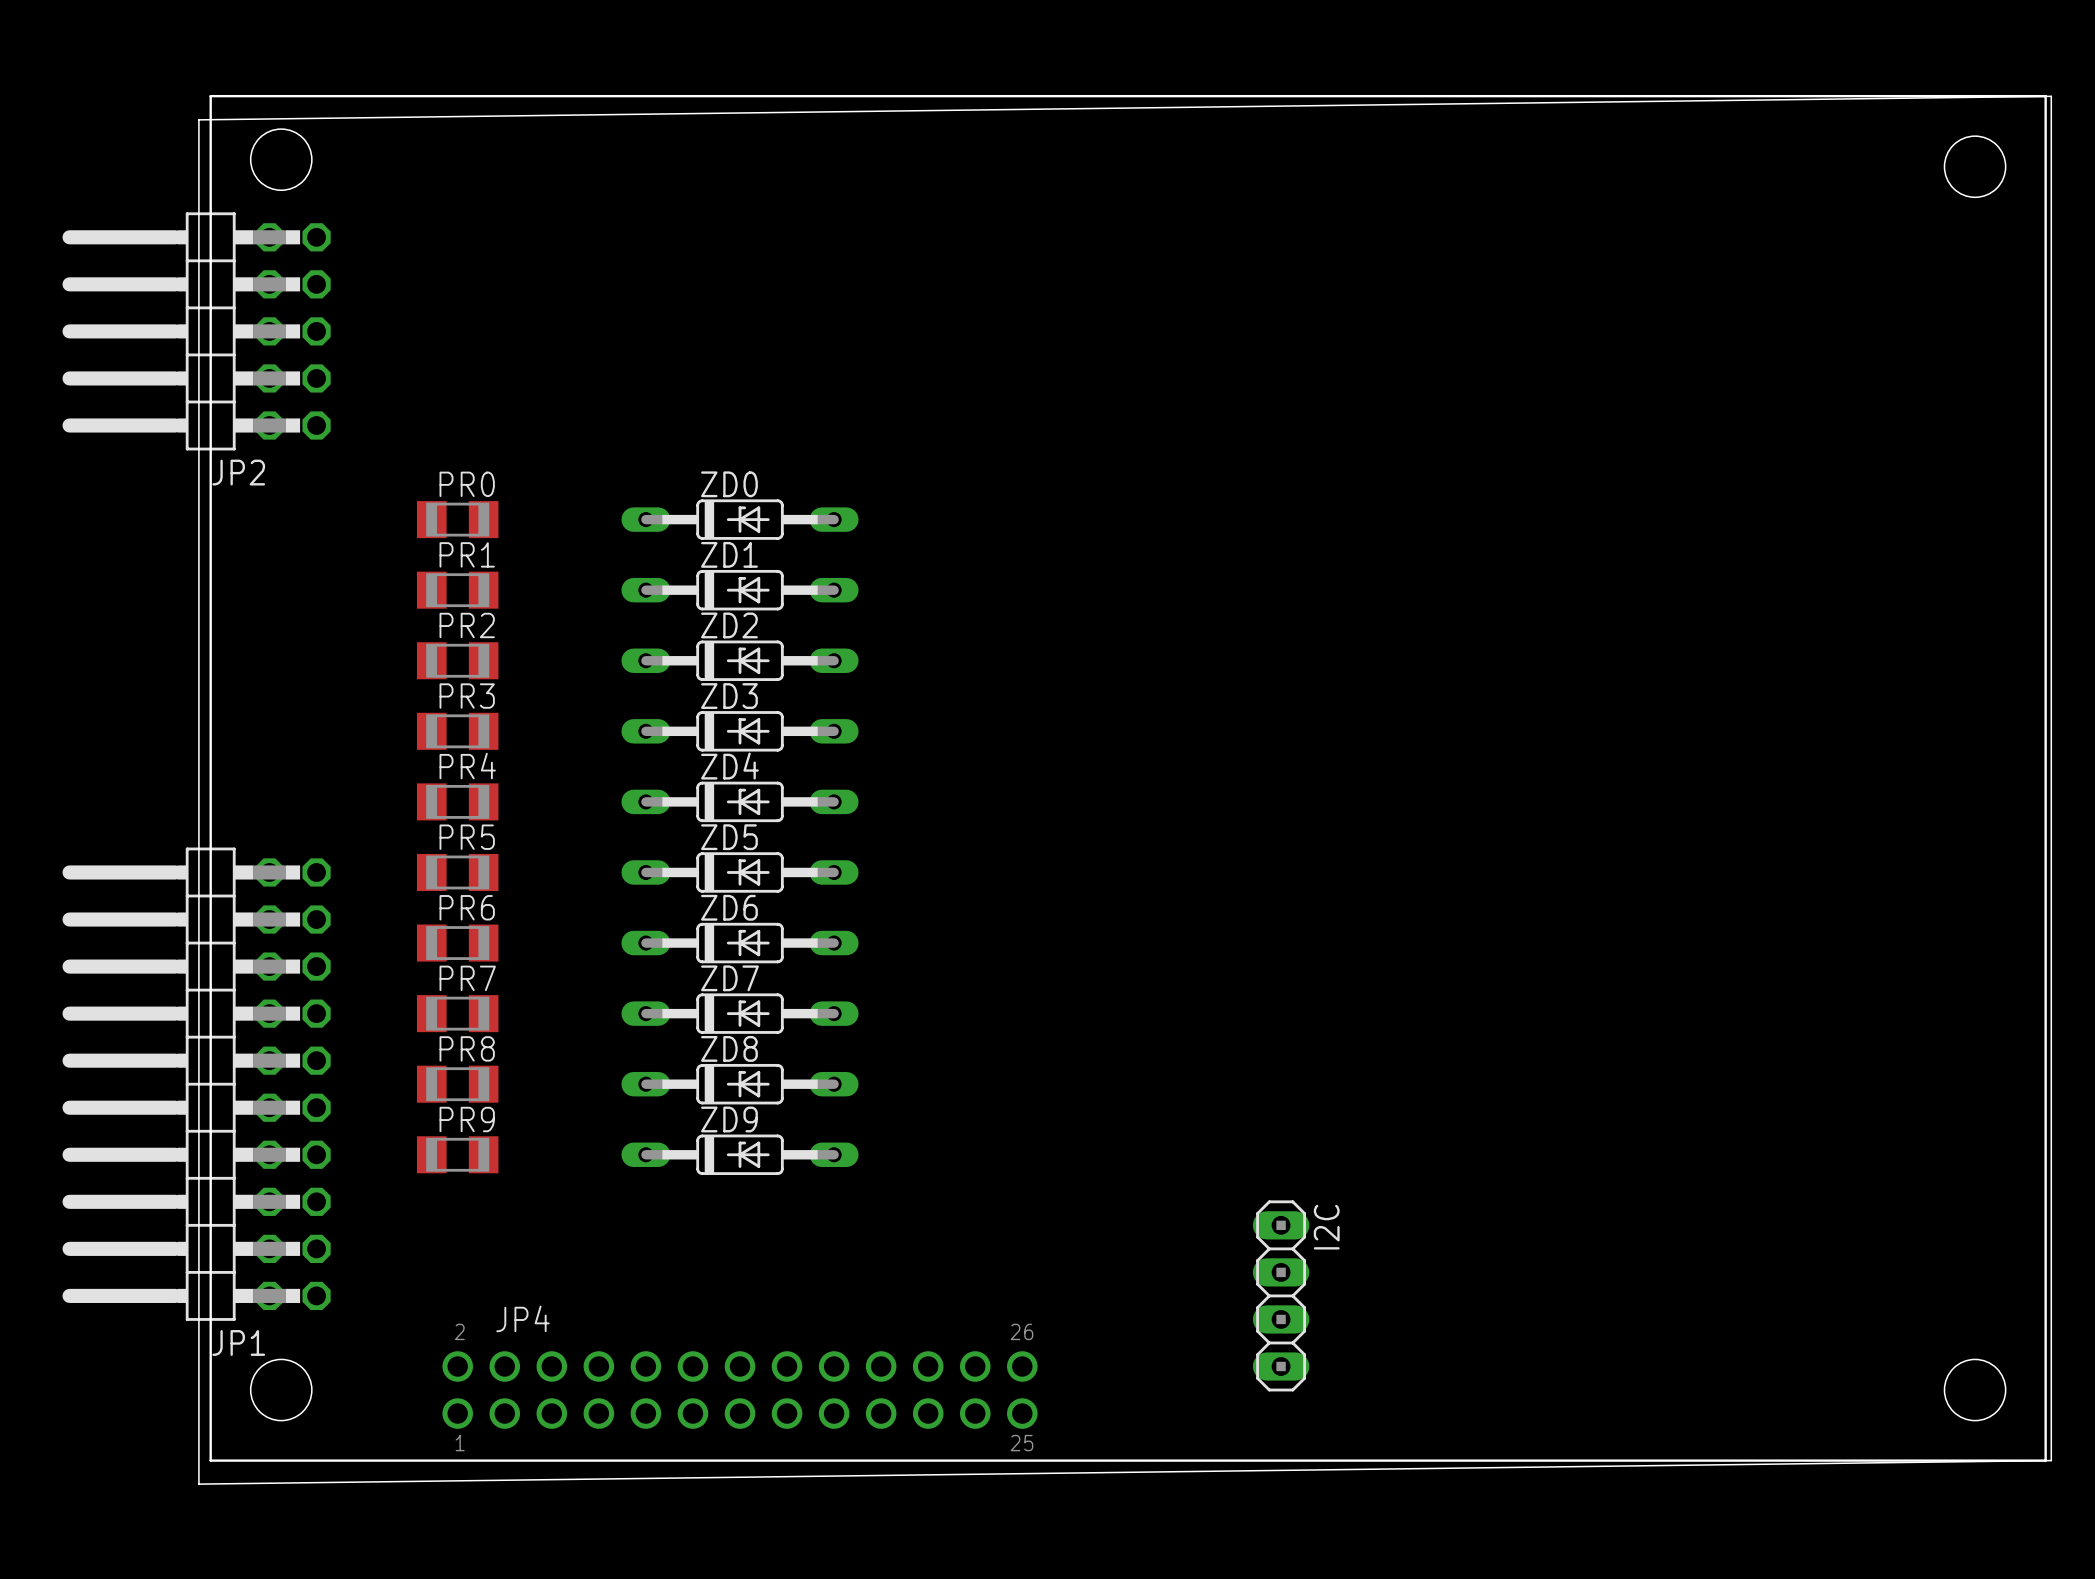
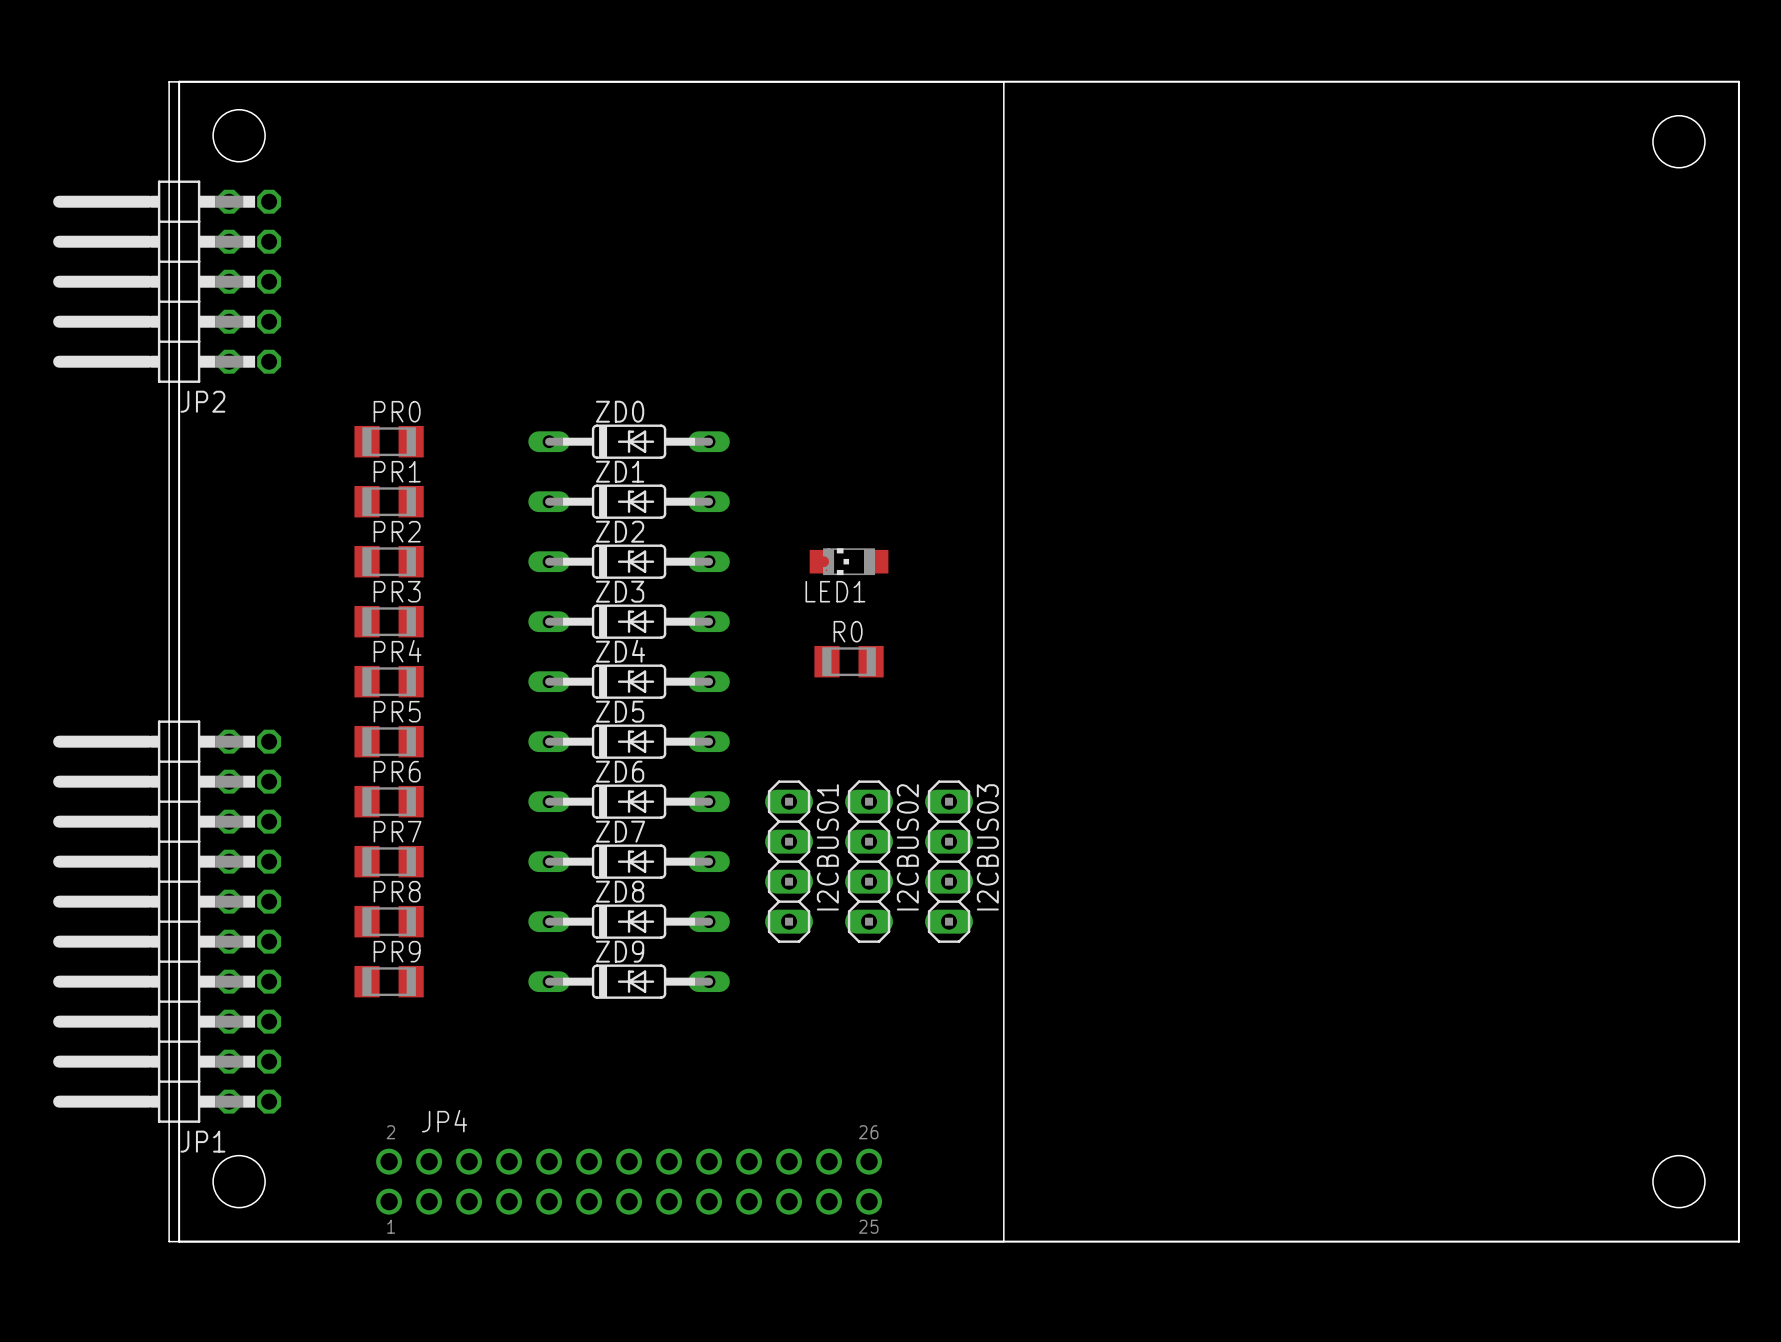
board edge: (198, 119) (2051, 96) (2051, 1460) (198, 1484) (198, 1460) -> (169, 101) (169, 81) (1003, 81) (1003, 1241) (169, 1241)
LED1: none -> (849, 561)
R0: none -> (849, 661)
I2CBUS01: none -> (789, 861)
I2CBUS02: none -> (869, 861)
I2CBUS03: none -> (949, 861)
I2C: (1281, 1295) -> none

